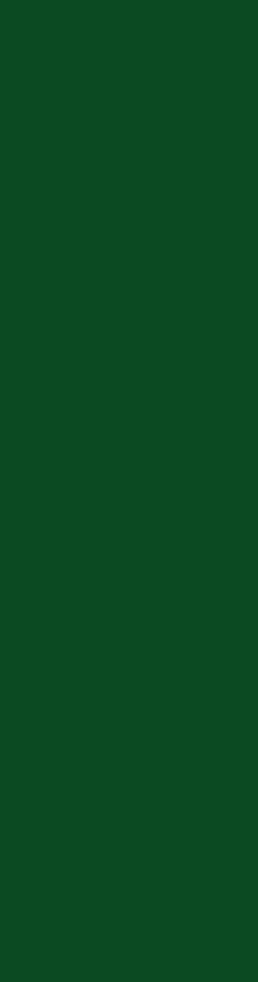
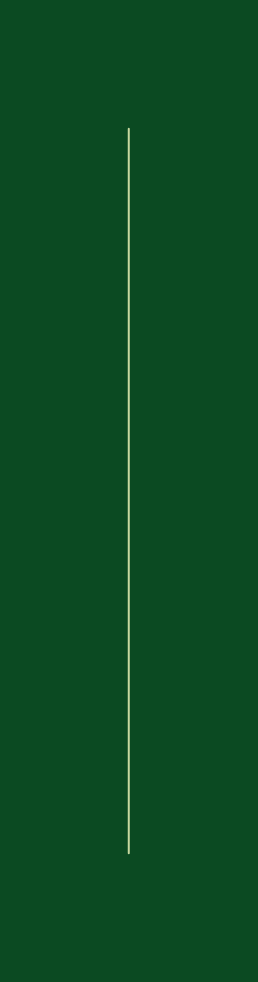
board edge: none -> (128, 128) (128, 853)

